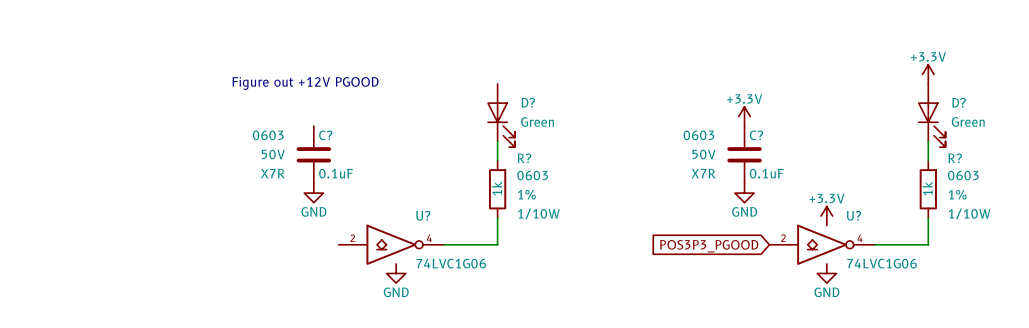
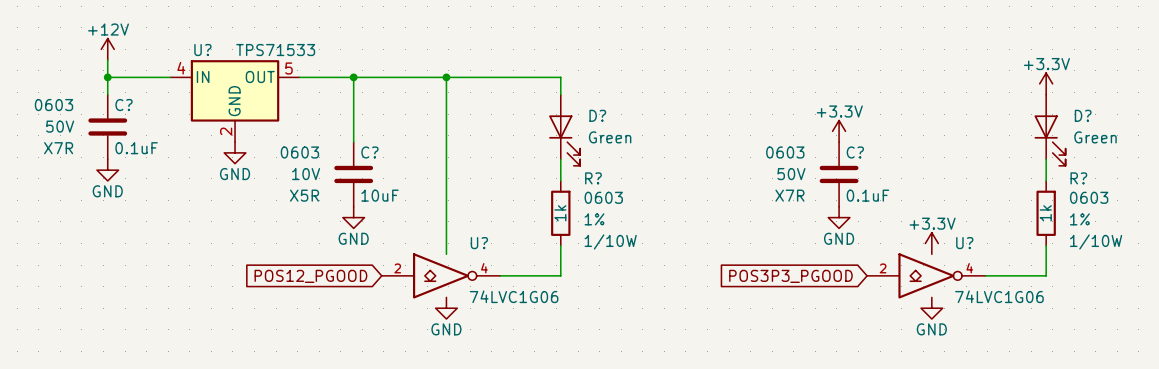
power symbol: none -> +12V (107, 49)
wire: none -> (107, 60) (107, 94)
wire: none -> (107, 77) (170, 77)
junction: none -> (107, 77)
wire: none -> (299, 77) (560, 77) (560, 94)
wire: none -> (353, 77) (353, 142)
junction: none -> (353, 77)
wire: none -> (446, 77) (446, 254)
junction: none -> (446, 77)
text: Figure out +12V PGOOD (305, 83) -> none
U?: none -> TPS71533 (235, 101)
C?: none -> 0.1uF (107, 127)
power symbol: none -> GND (235, 152)
power symbol: none -> GND (107, 170)
C? text: 50V (273, 154) -> 10V (306, 174)
C? text: X7R (272, 173) -> X5R (304, 195)
C? value: 0.1uF (336, 173) -> 10uF (379, 195)
global label: none -> POS12_PGOOD (310, 276)

